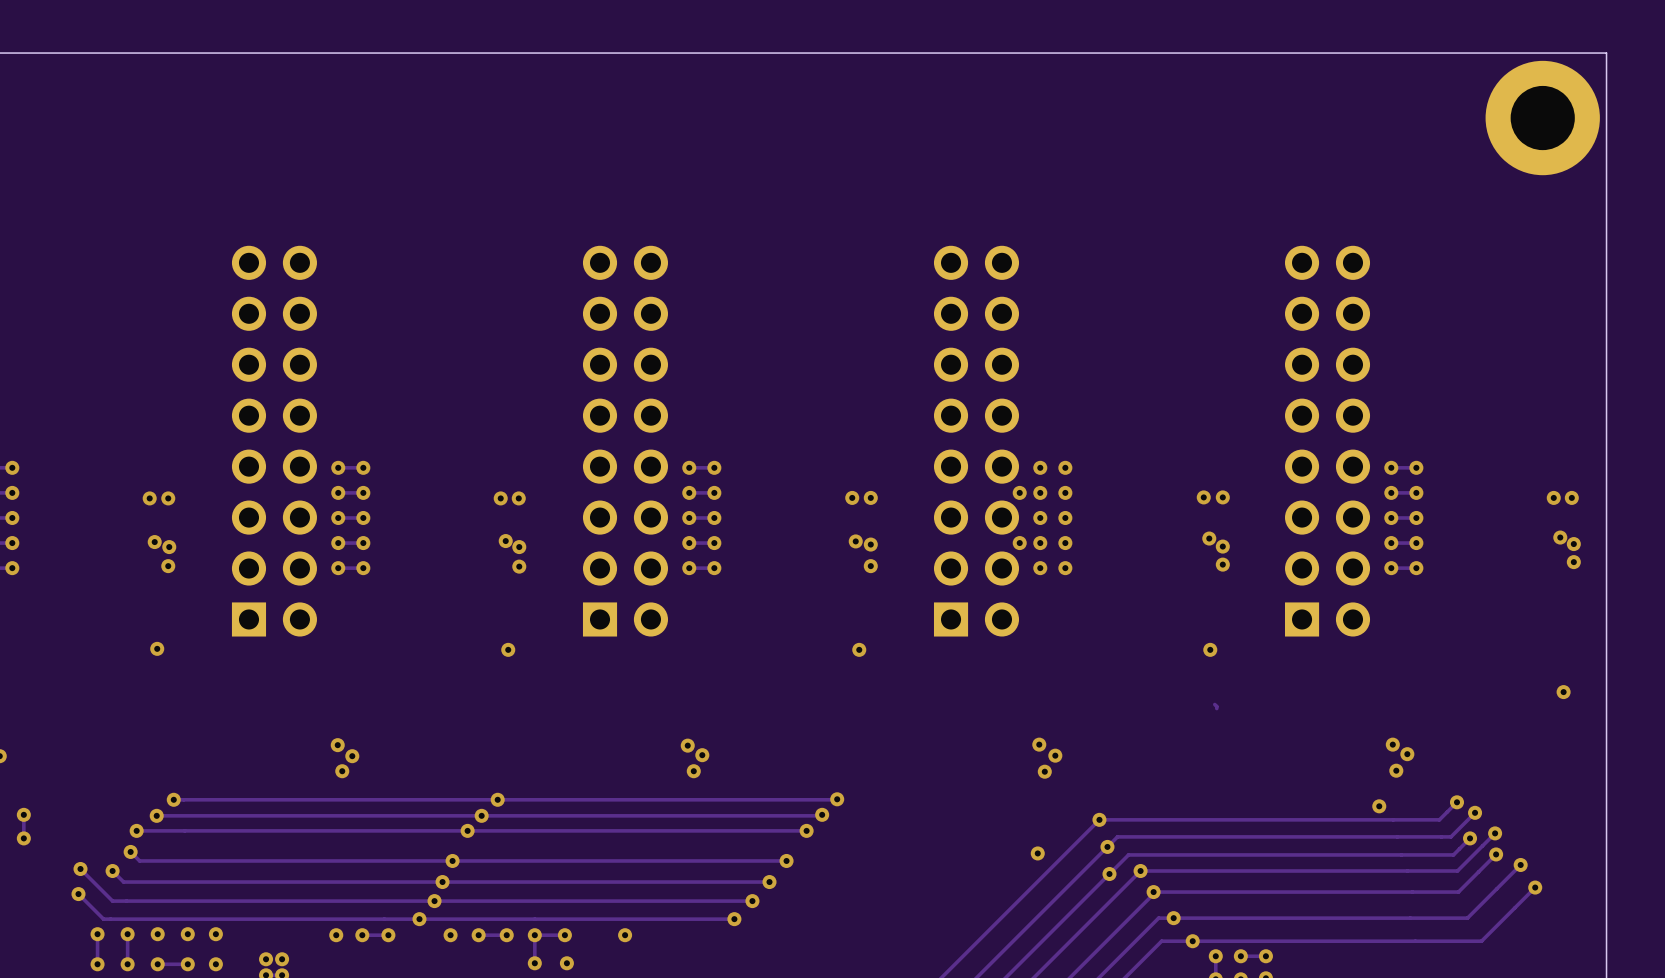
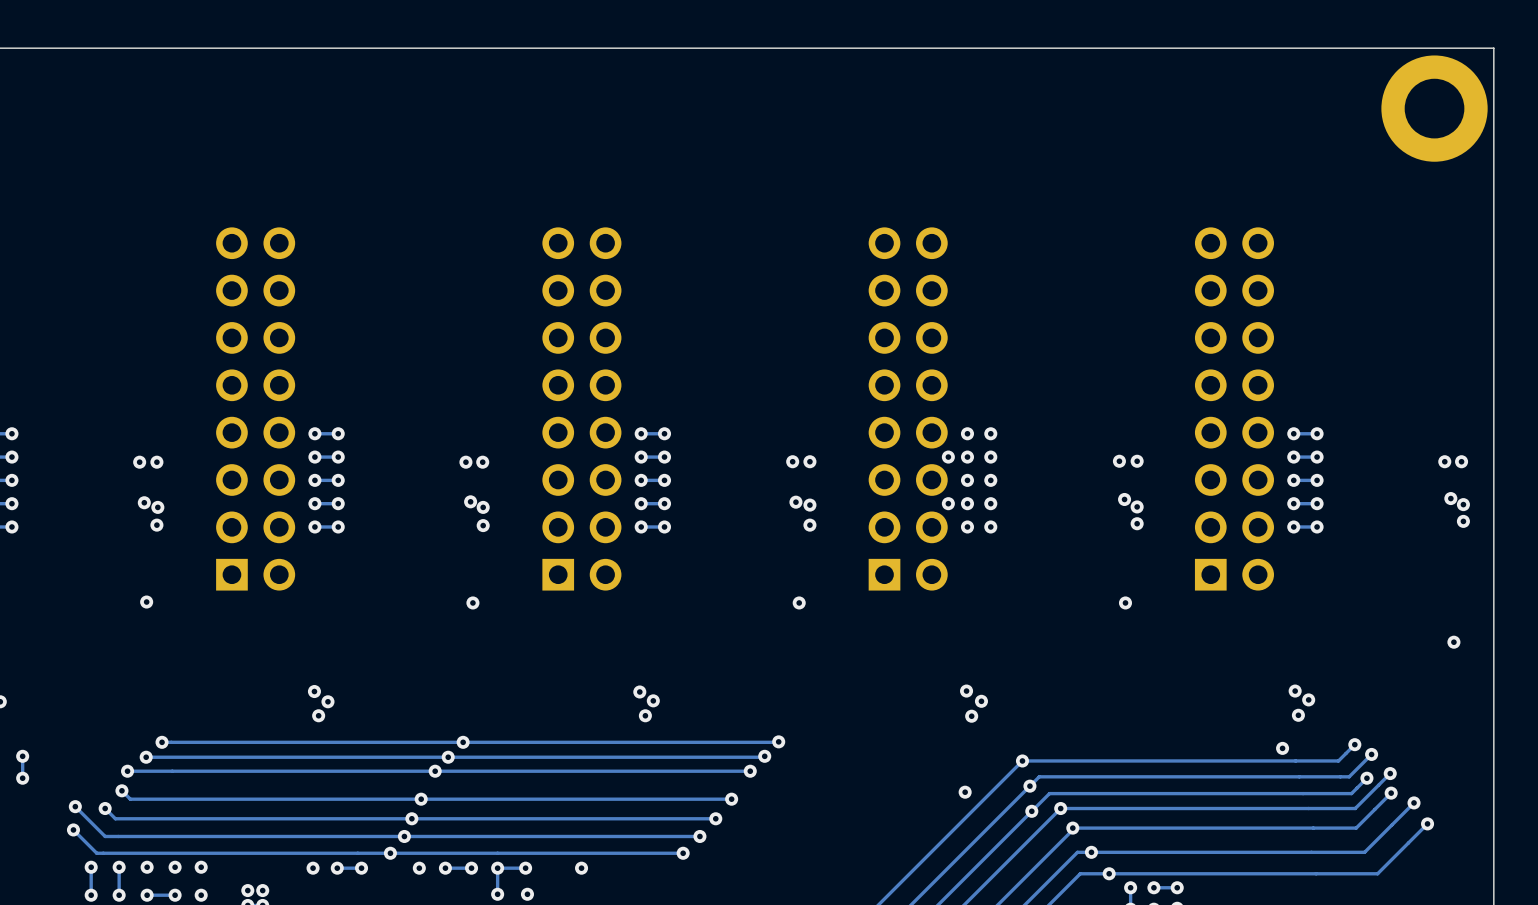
track: (1214, 704) (1216, 708) -> none

